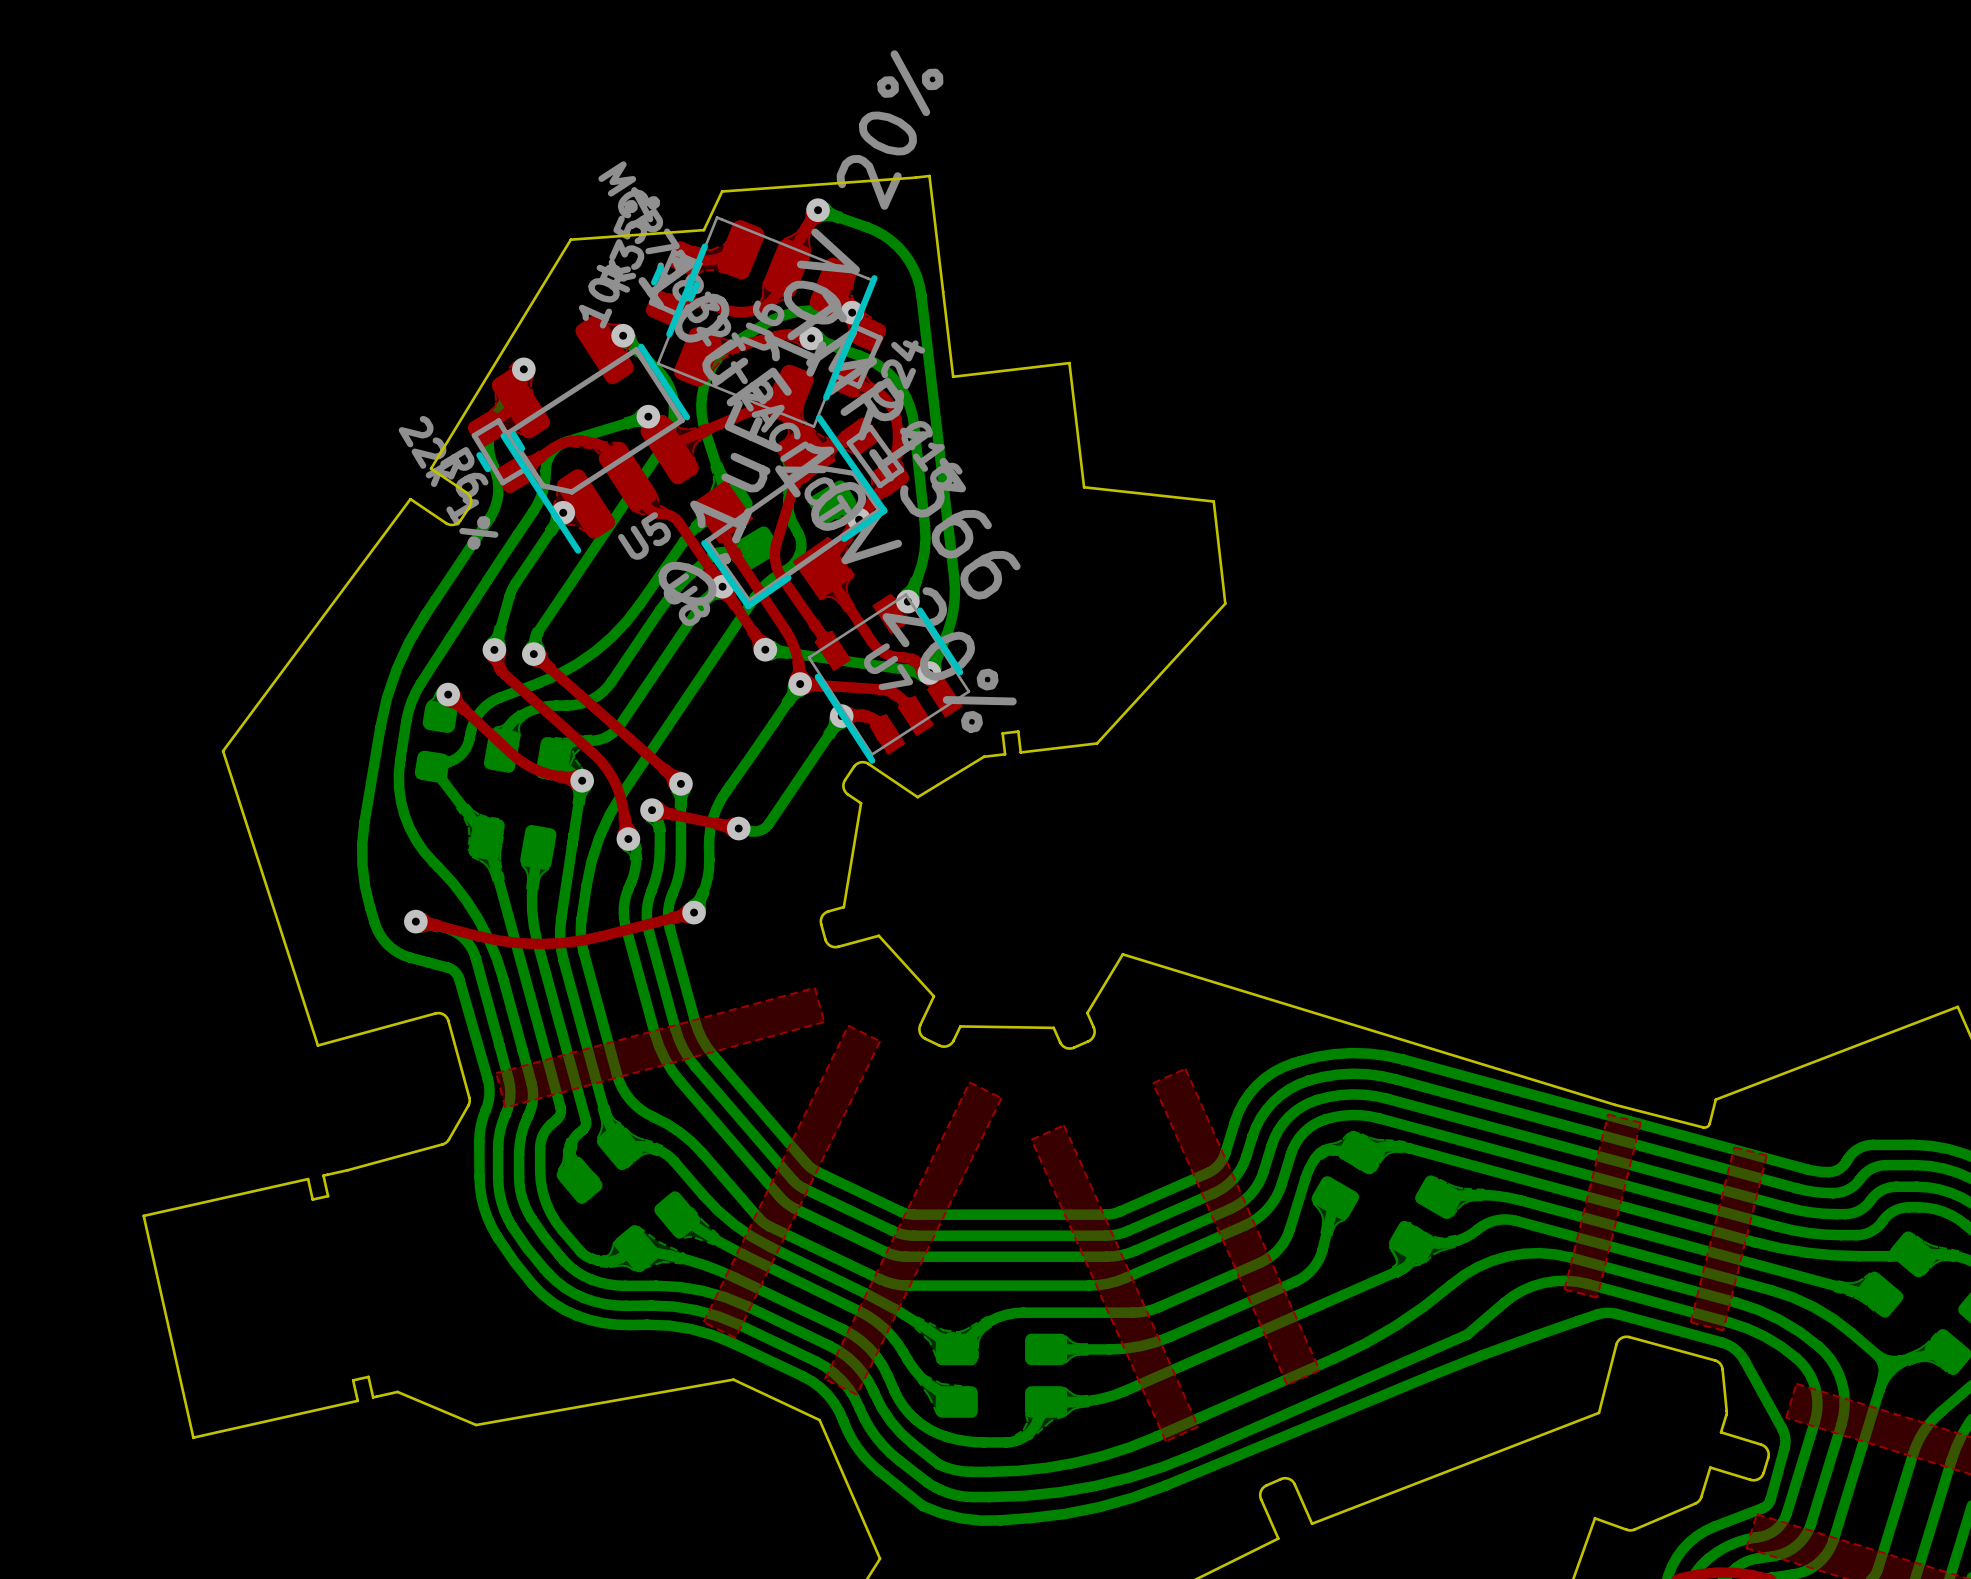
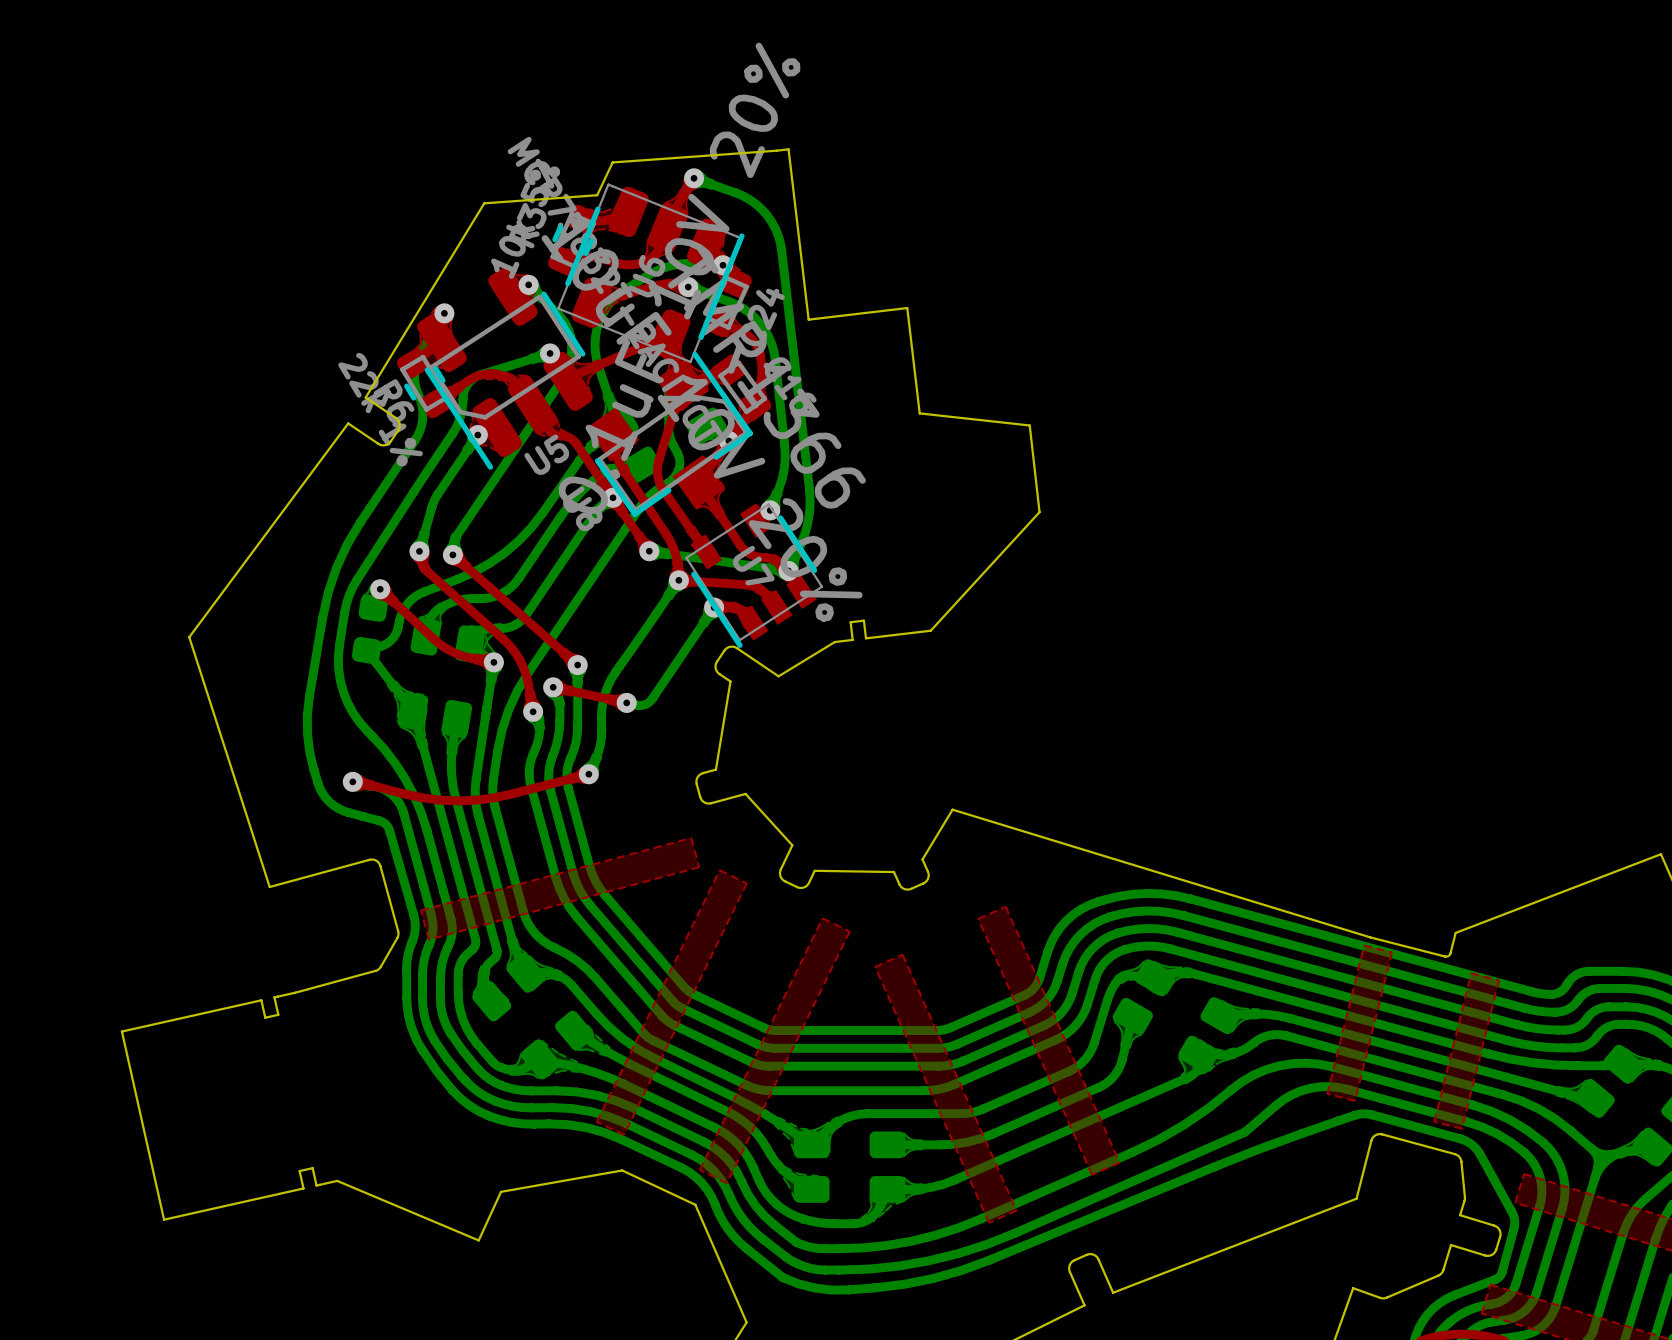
board edge: (590, 1404) (476, 1425) -> (501, 1191) (478, 1240) (403, 1208)

